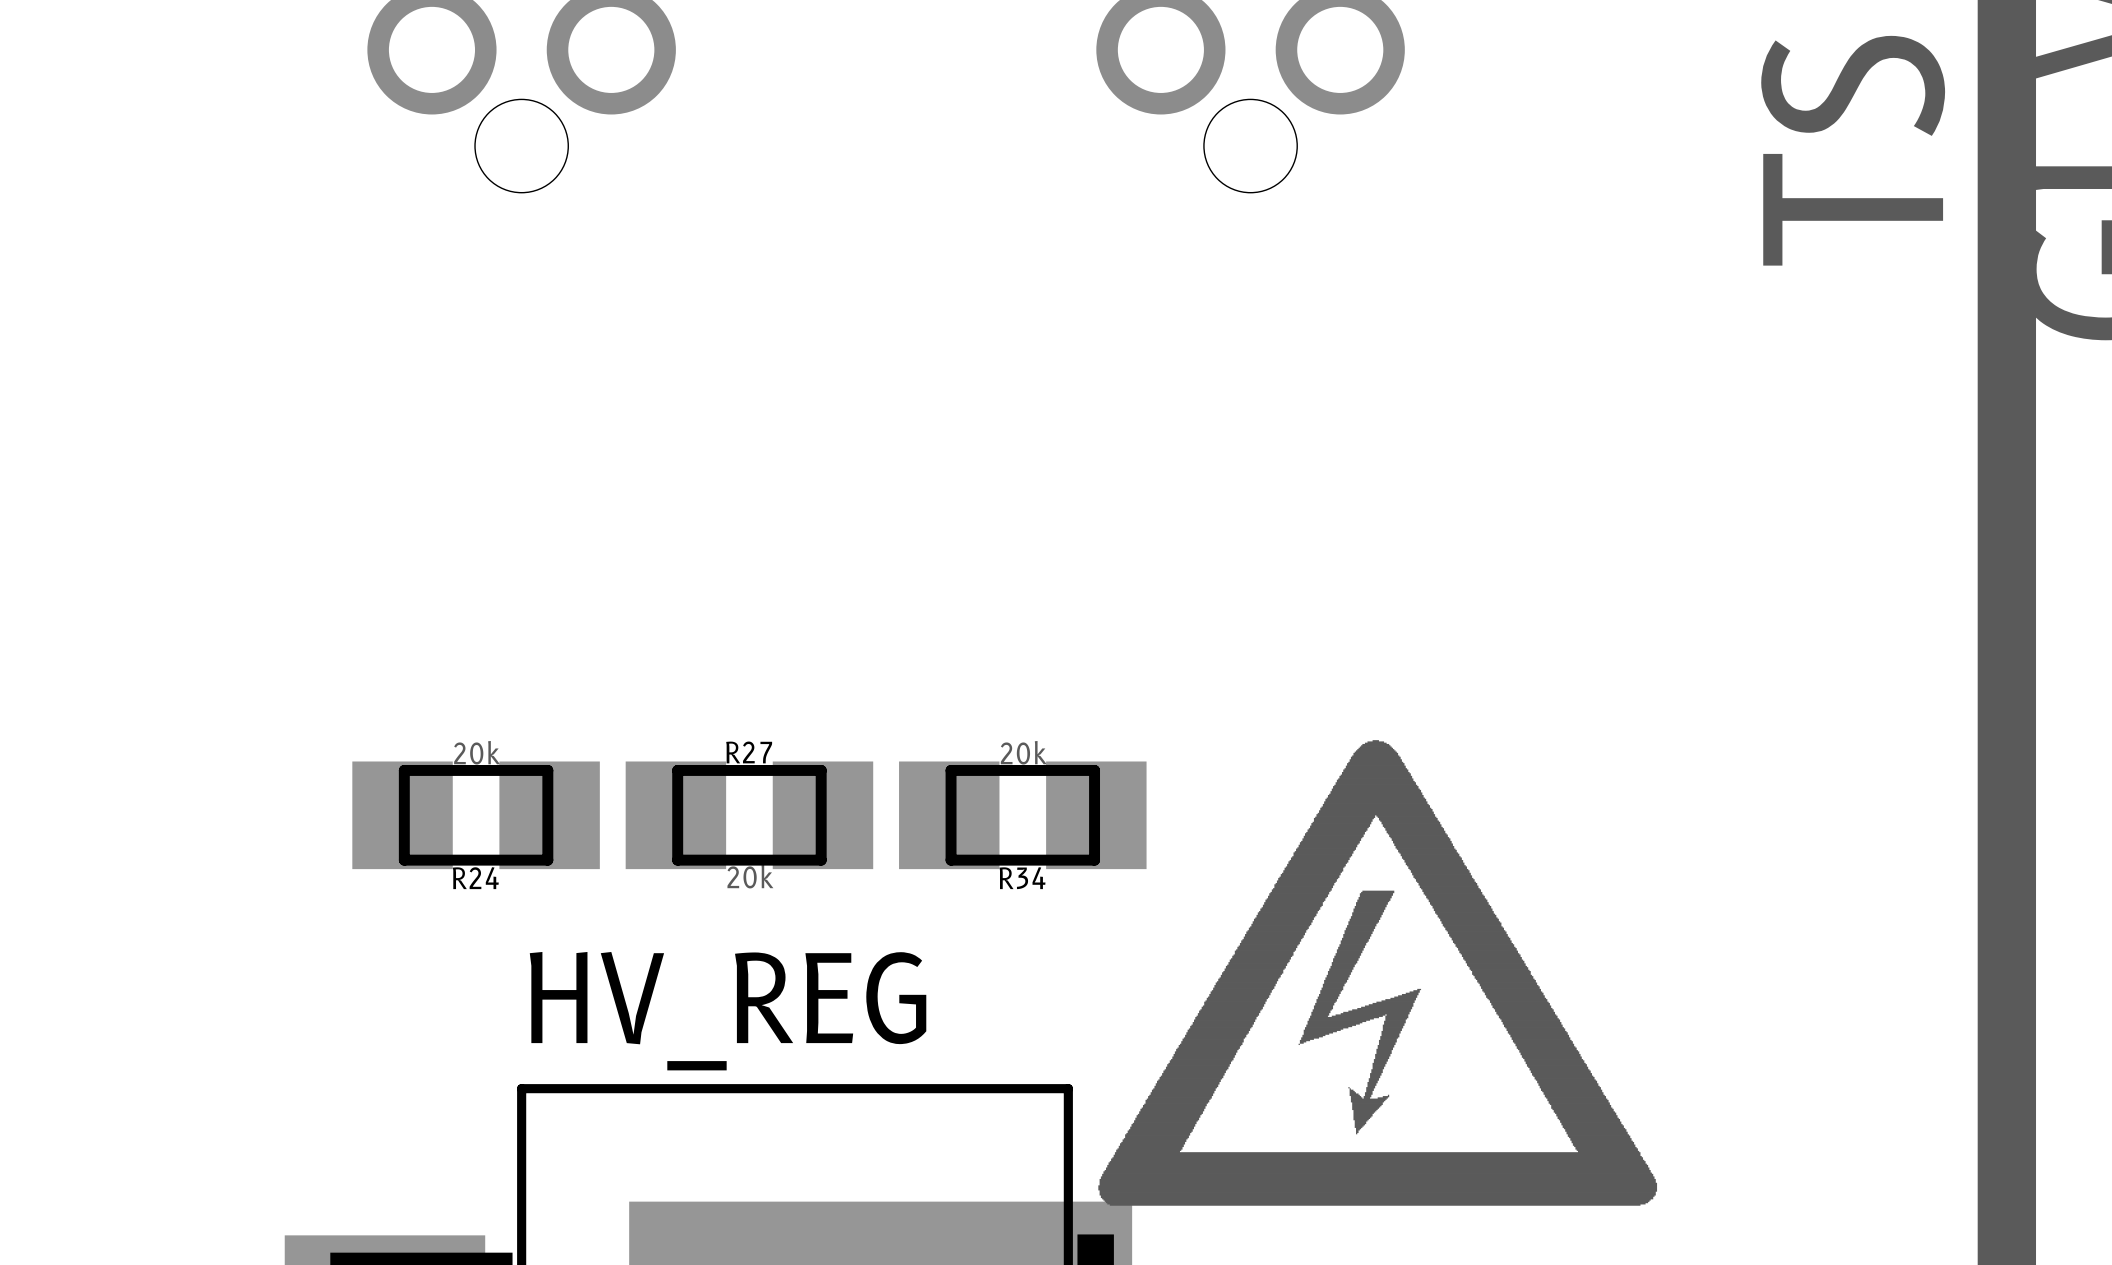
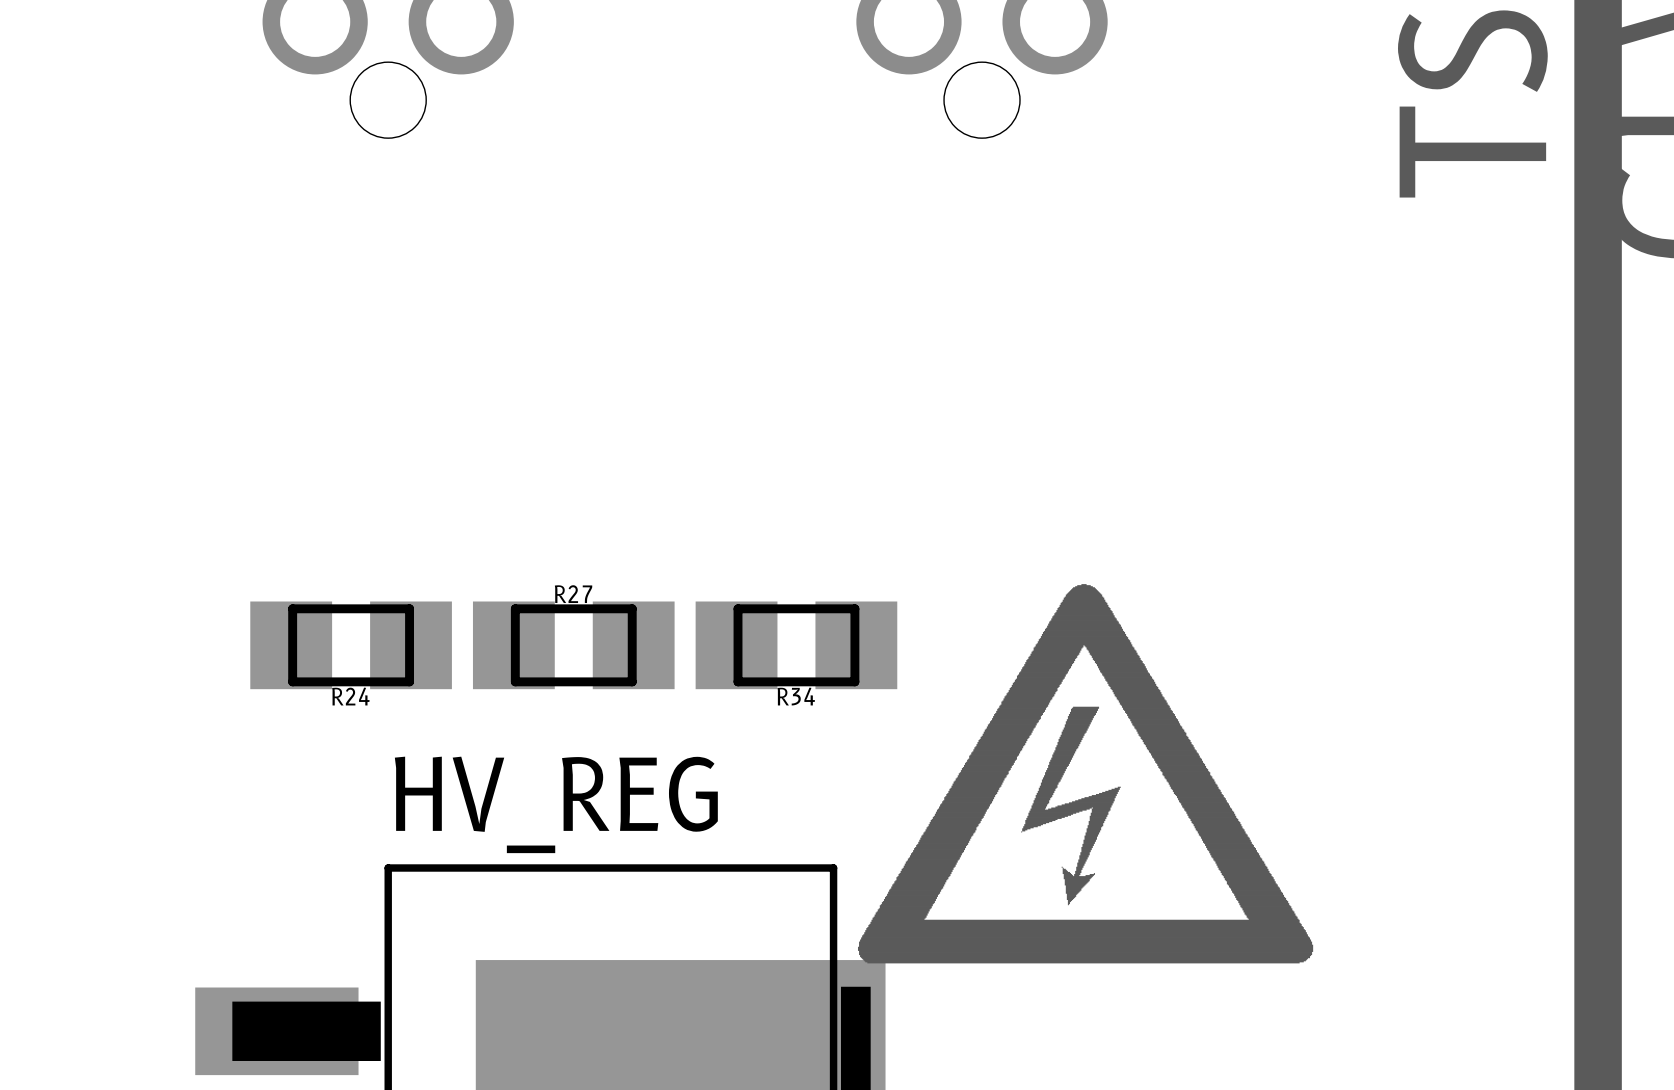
R24 value: 20k (477, 752) -> none
R34 value: 20k (1023, 752) -> none
R27 value: 20k (750, 876) -> none

